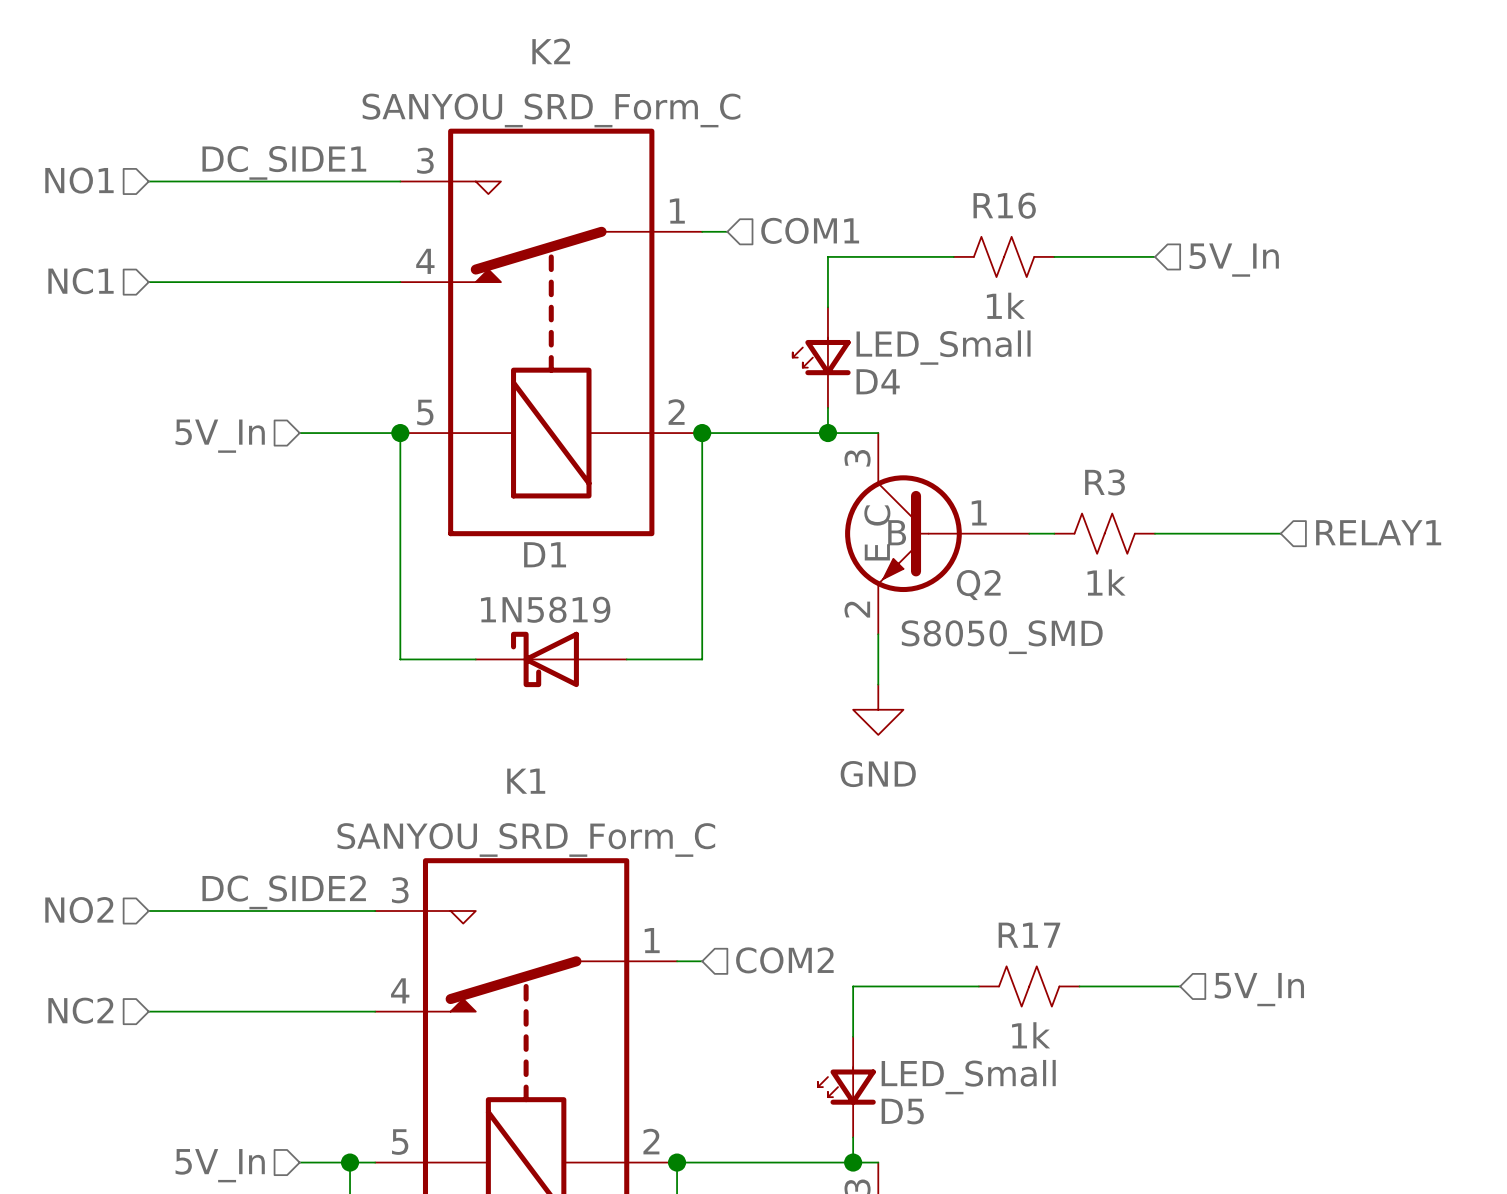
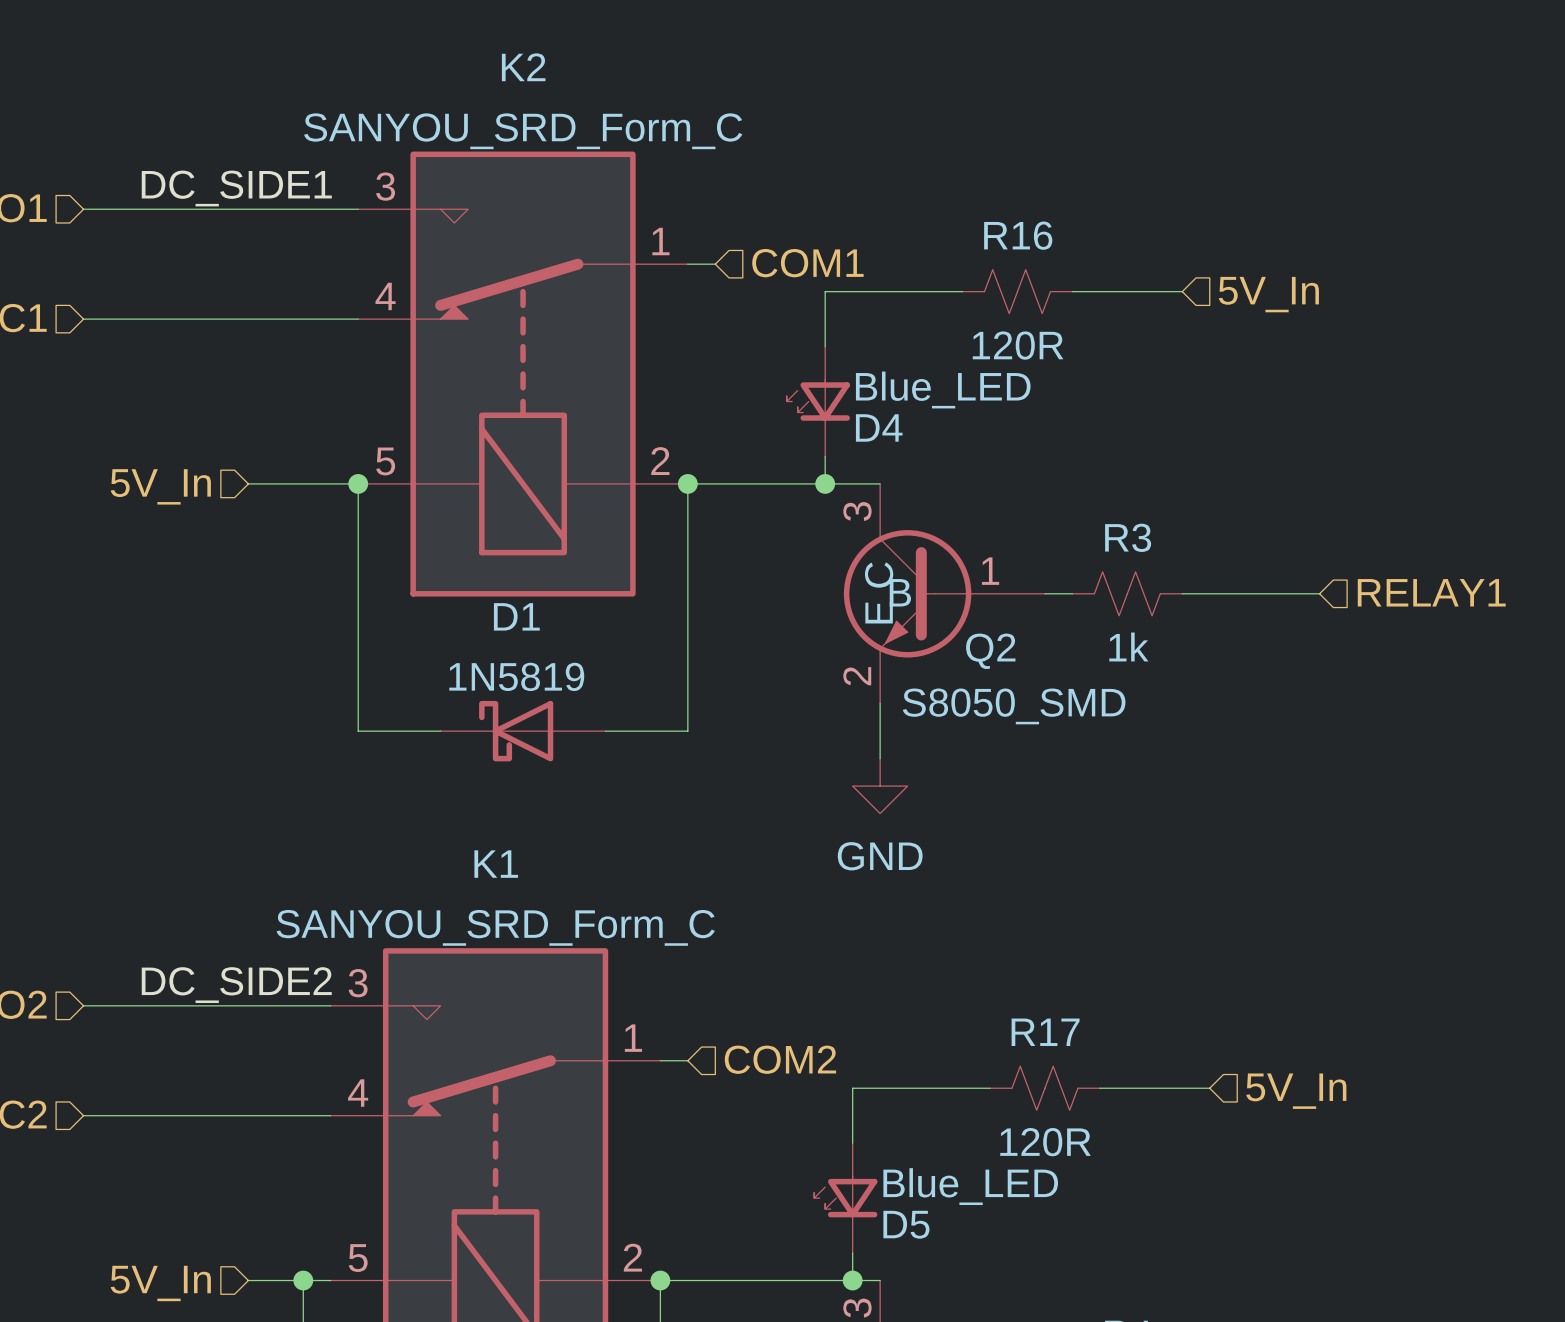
R16 value: 1k (1005, 305) -> 120R (1018, 345)
D4 value: LED_Small (943, 347) -> Blue_LED (943, 390)
R17 value: 1k (1031, 1035) -> 120R (1045, 1142)
D5 value: LED_Small (968, 1077) -> Blue_LED (970, 1186)

